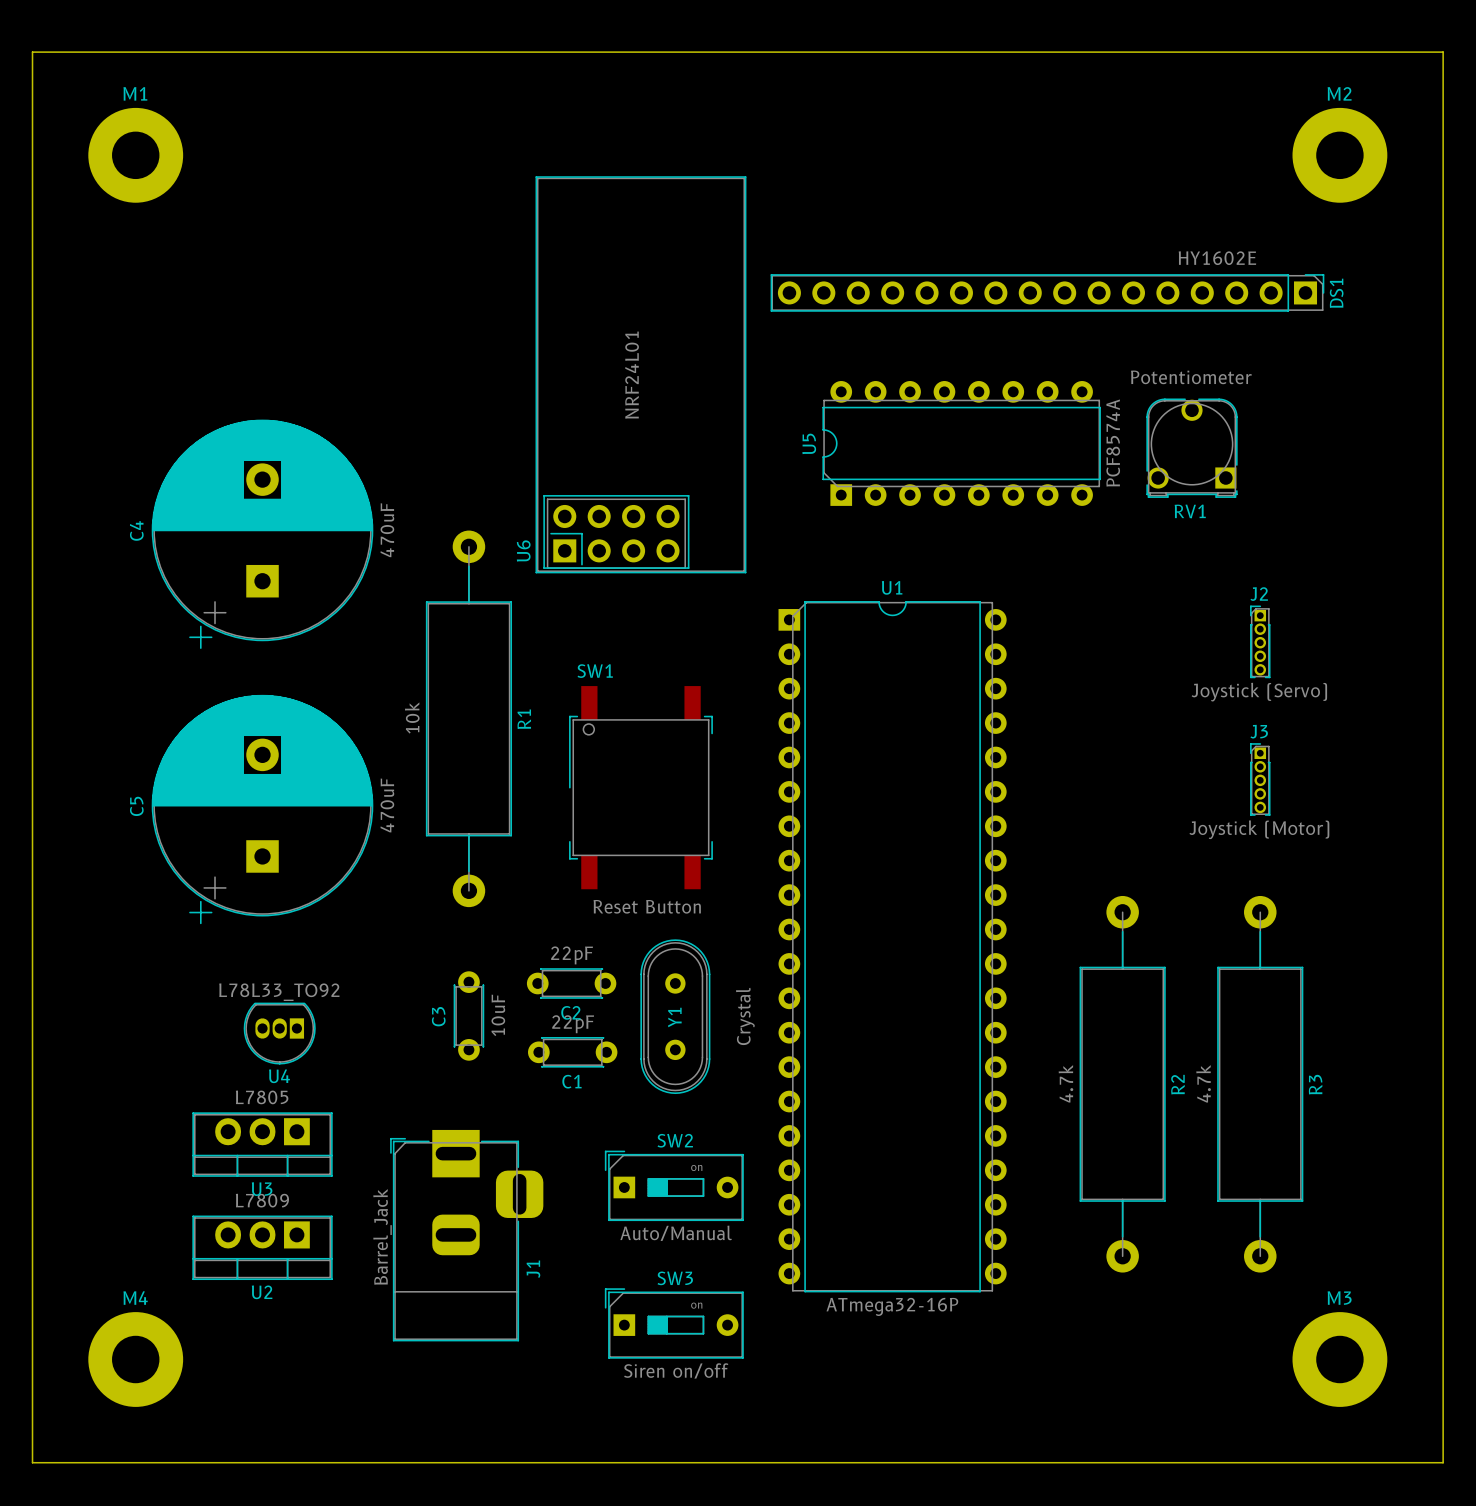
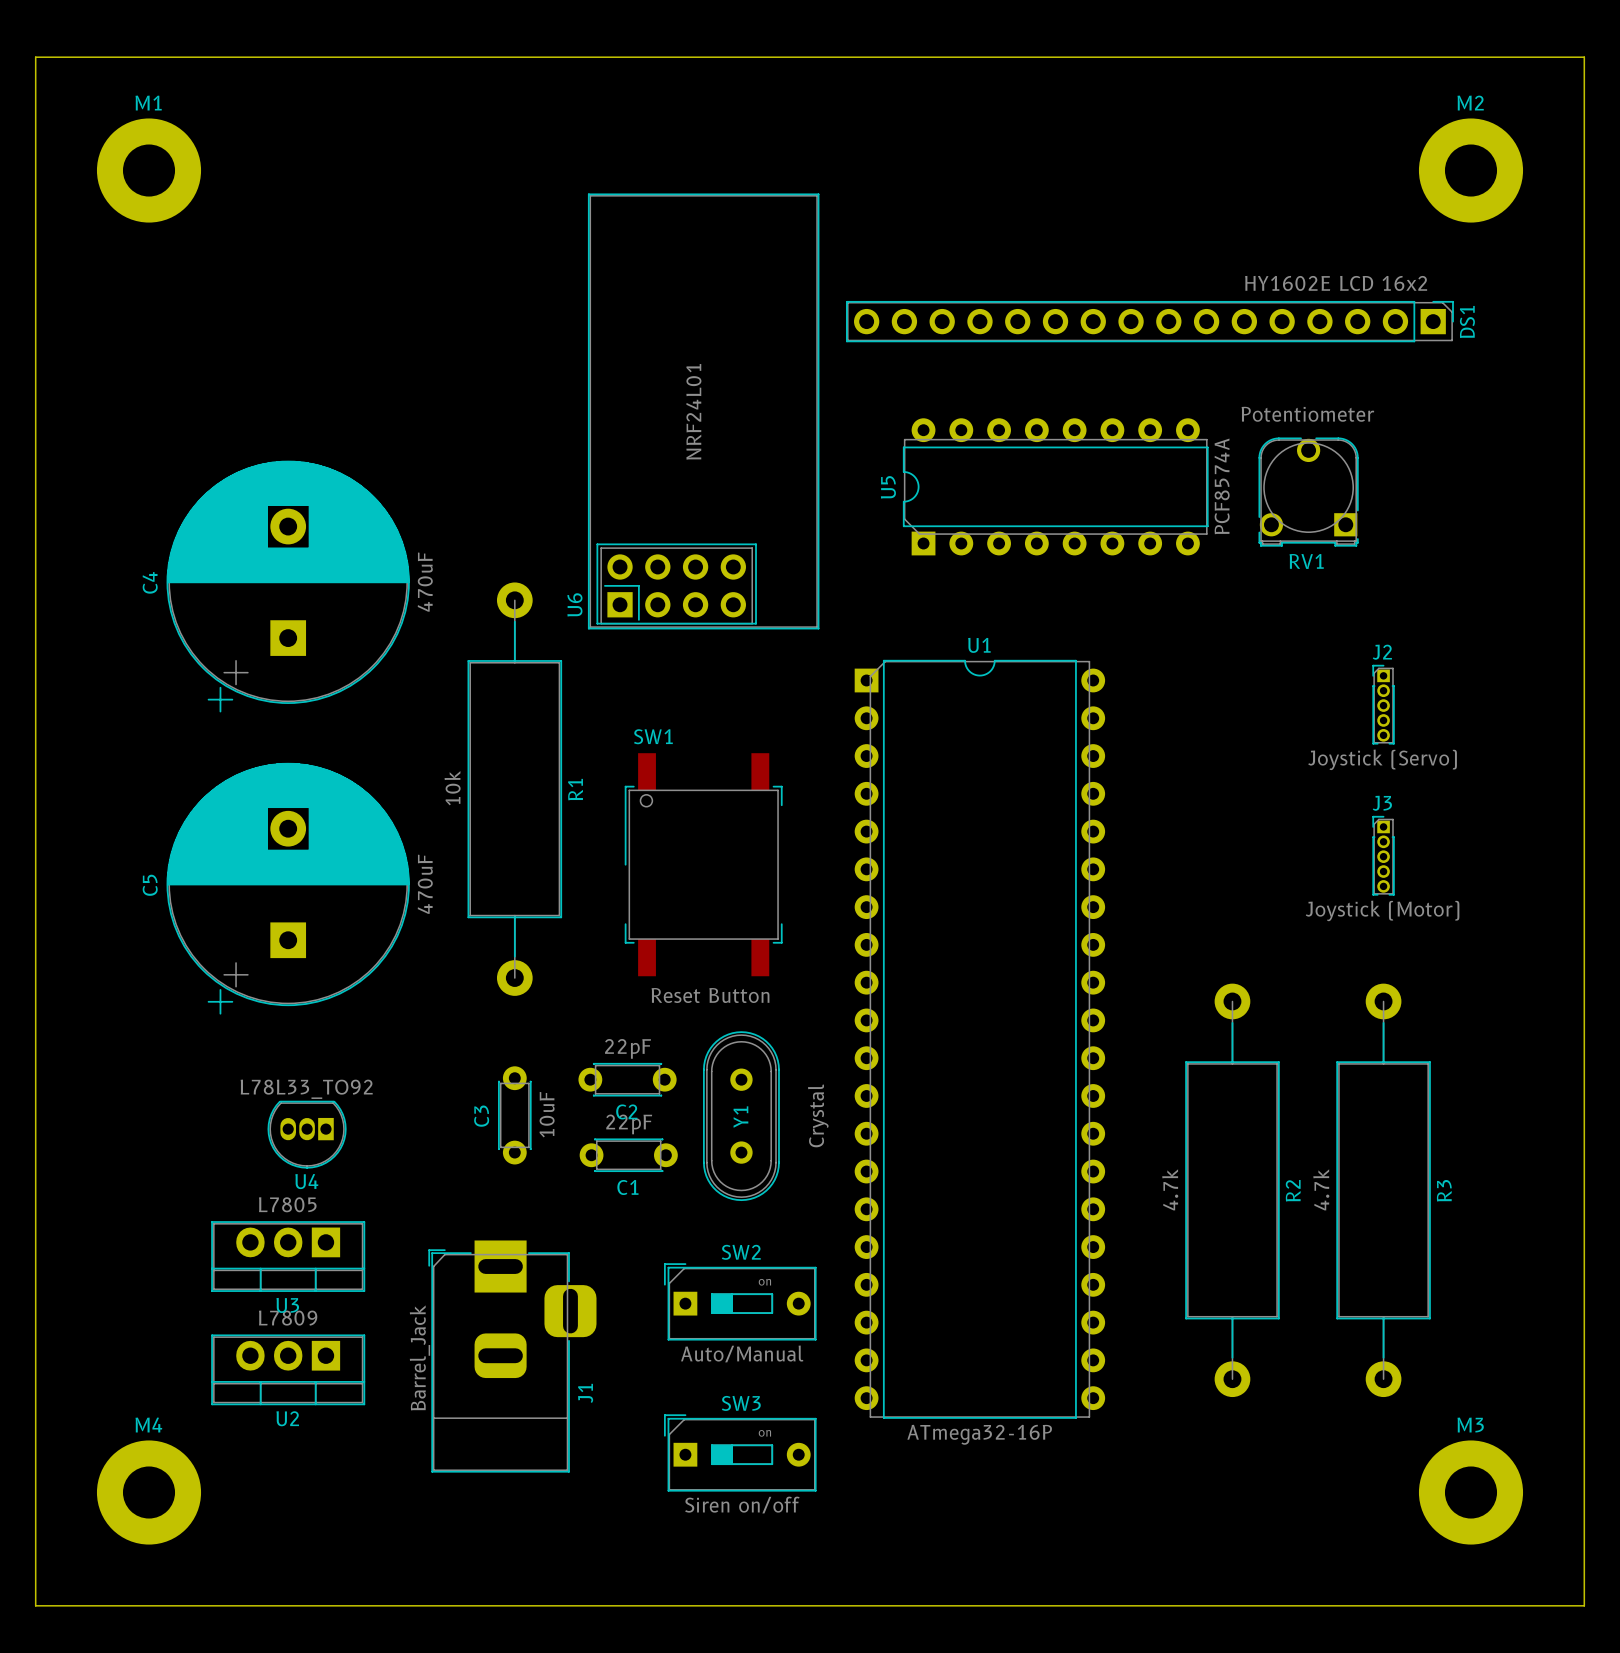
DS1 value: HY1602E (1217, 258) -> HY1602E LCD 16x2 (1336, 283)

